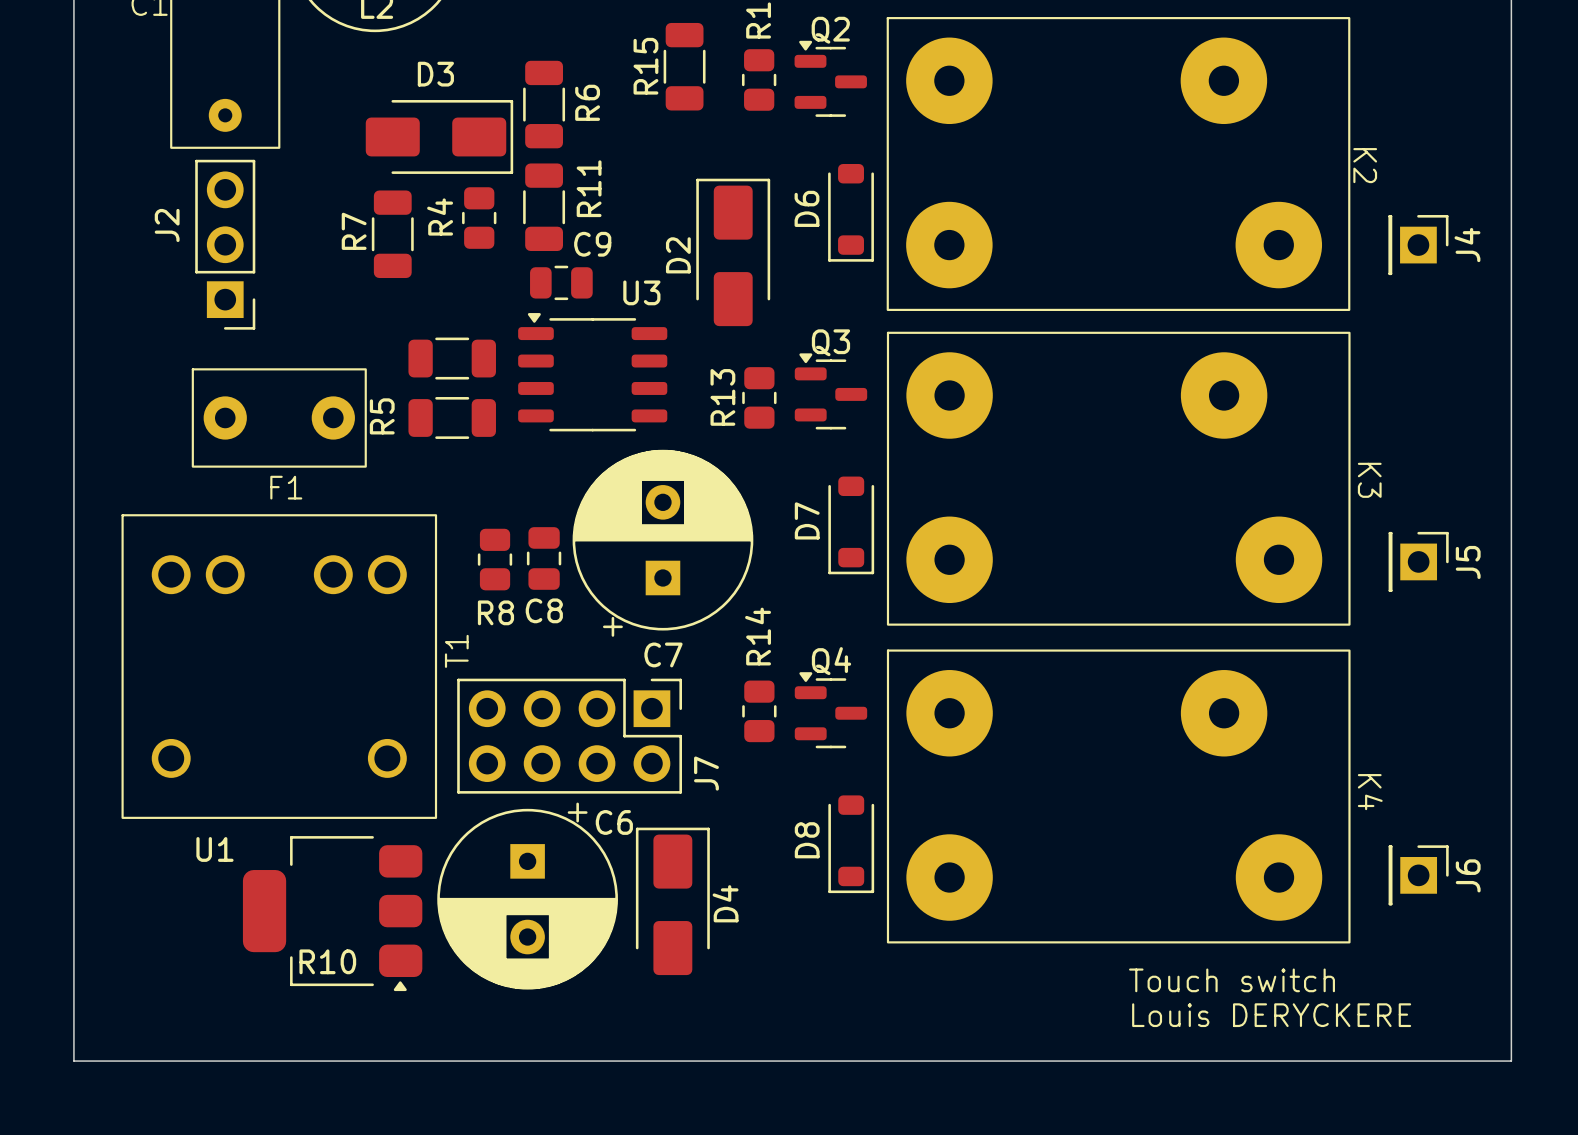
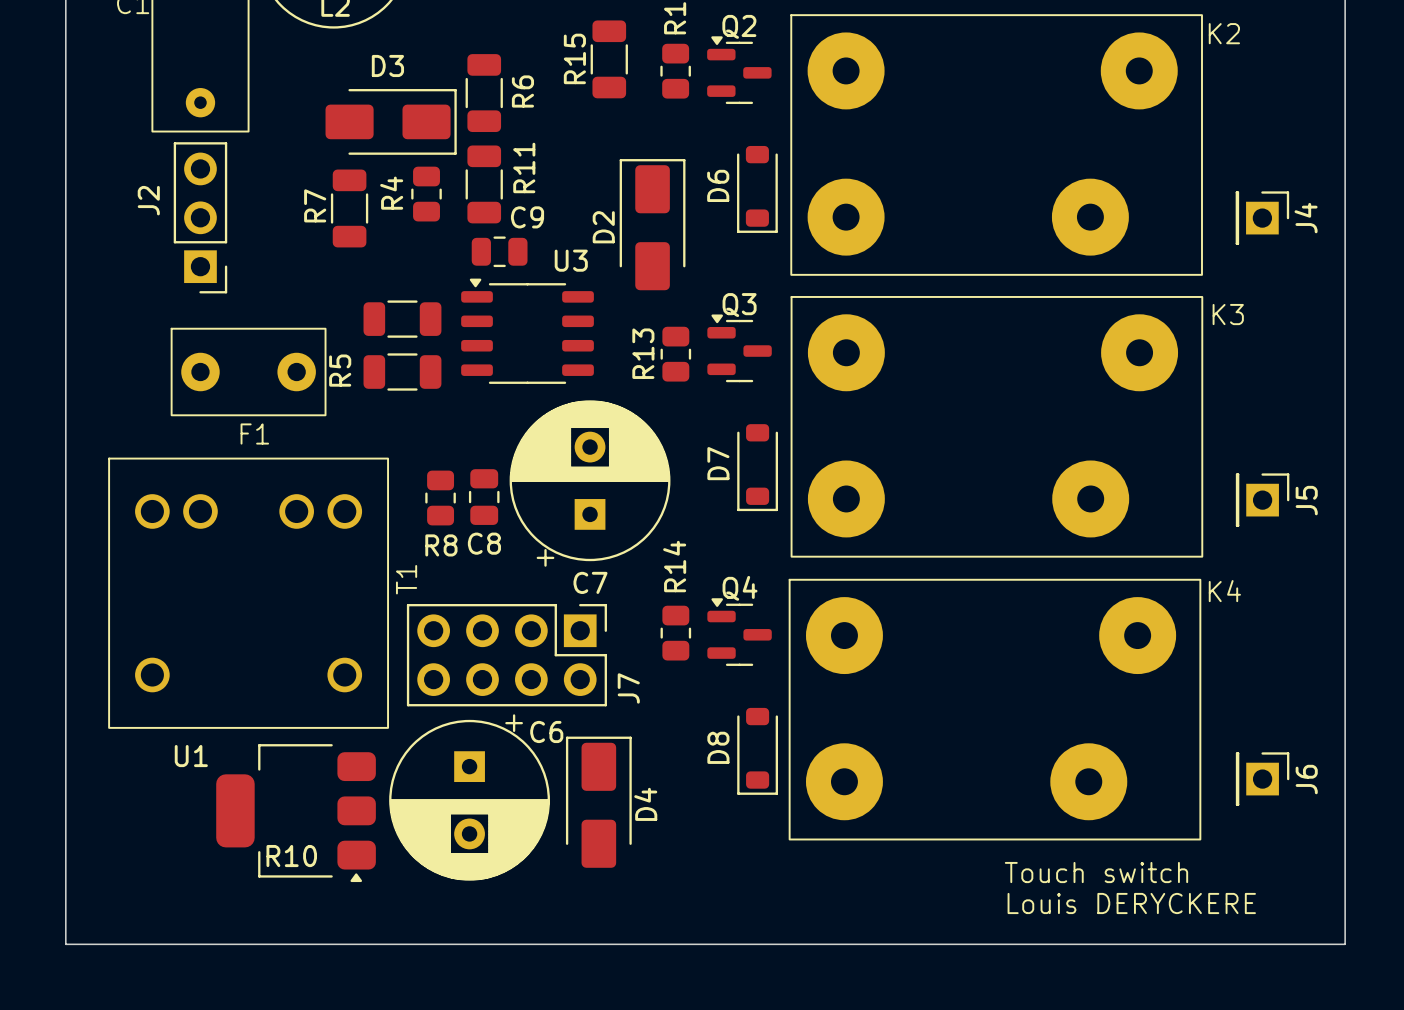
K2 footprint: [886, 17, 1351, 311] -> [790, 14, 1203, 276]
K2 name position: K2 (1365, 165) -> K2 (1224, 33)
K3 footprint: [886, 331, 1351, 626] -> [790, 296, 1204, 558]
K3 name position: K3 (1369, 480) -> K3 (1228, 314)
K4 footprint: [886, 649, 1351, 944] -> [788, 578, 1202, 841]
K4 name position: K4 (1370, 792) -> K4 (1224, 591)

